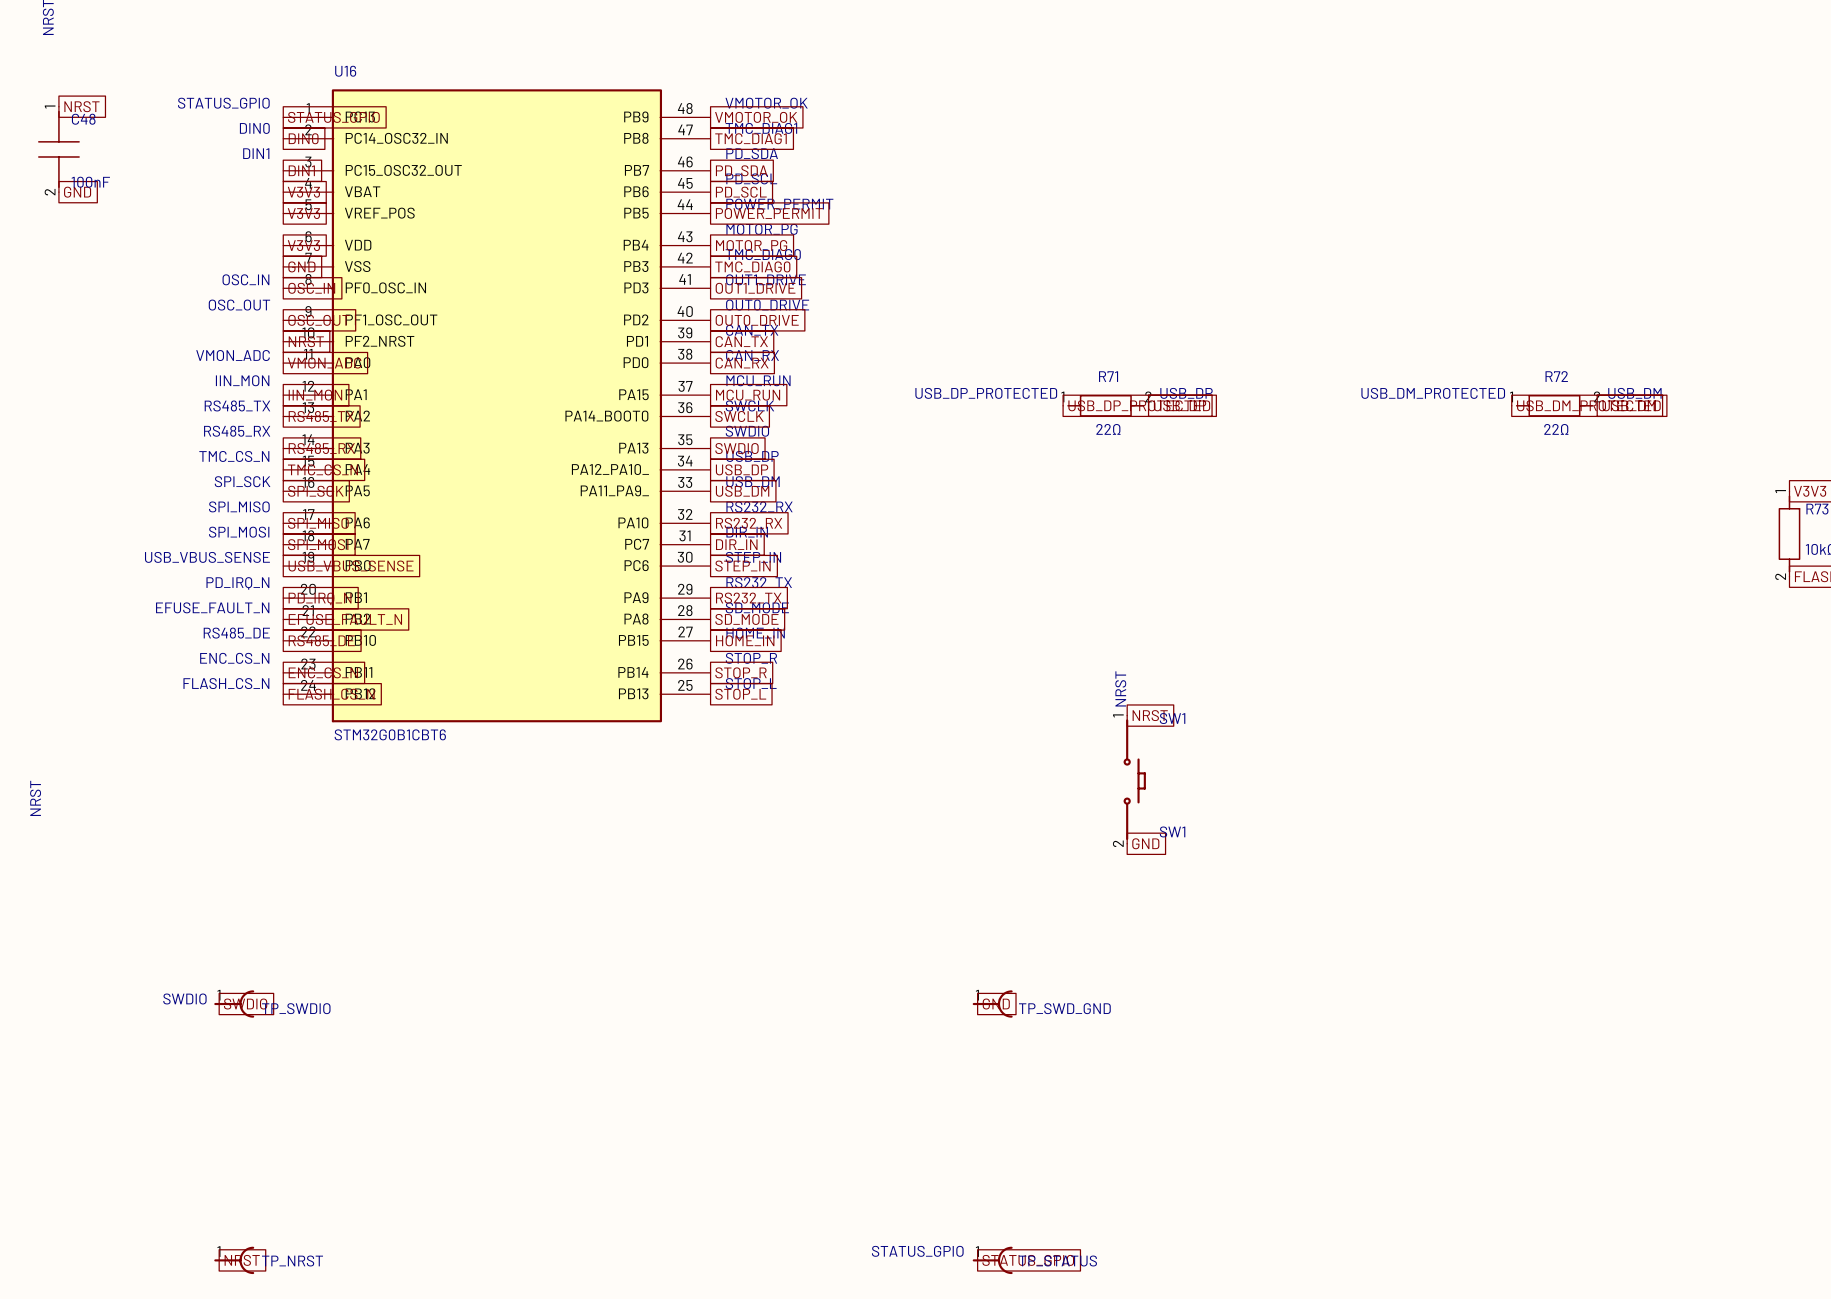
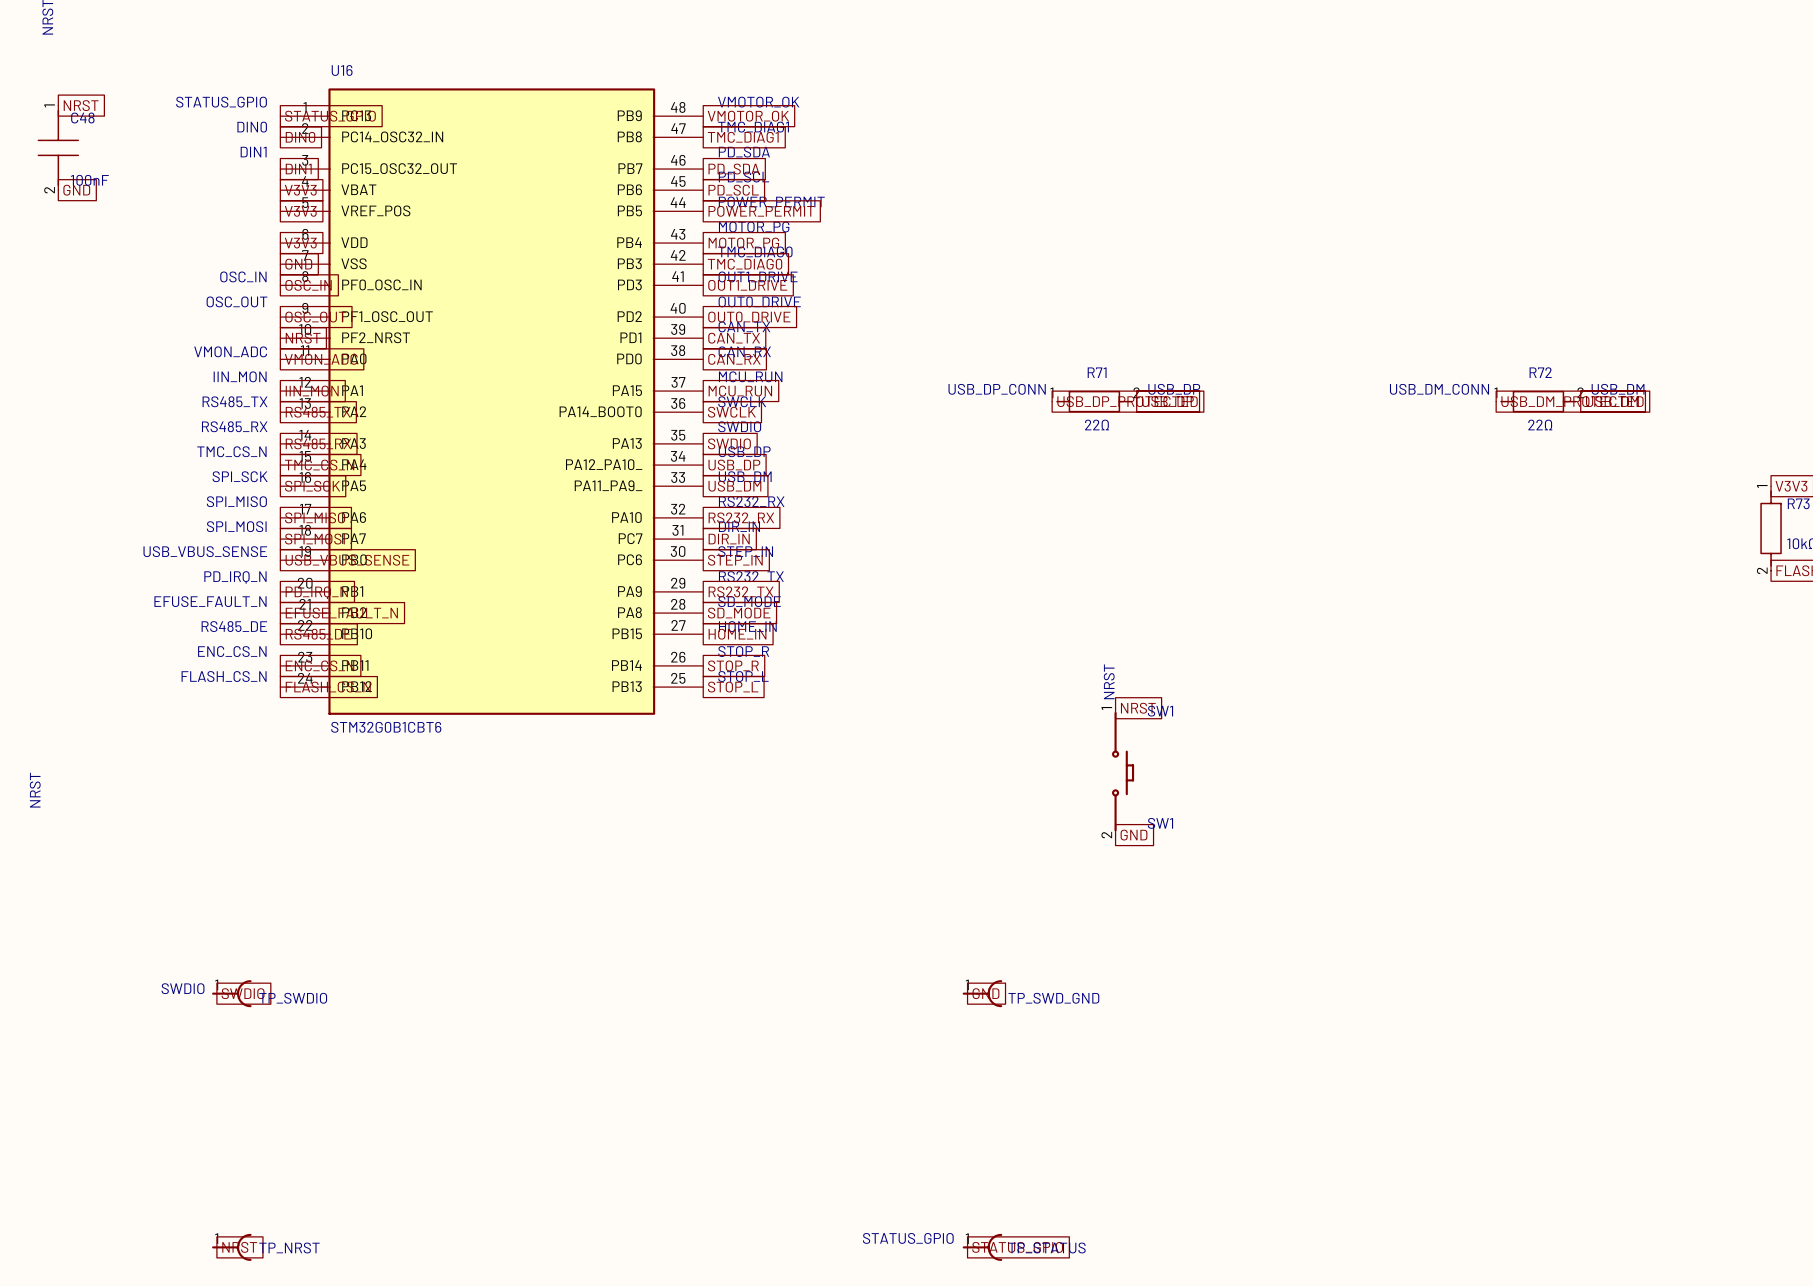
text: USB_DP_PROTECTED (986, 393) -> USB_DP_CONN (997, 389)
text: USB_DM_PROTECTED (1433, 393) -> USB_DM_CONN (1439, 389)

